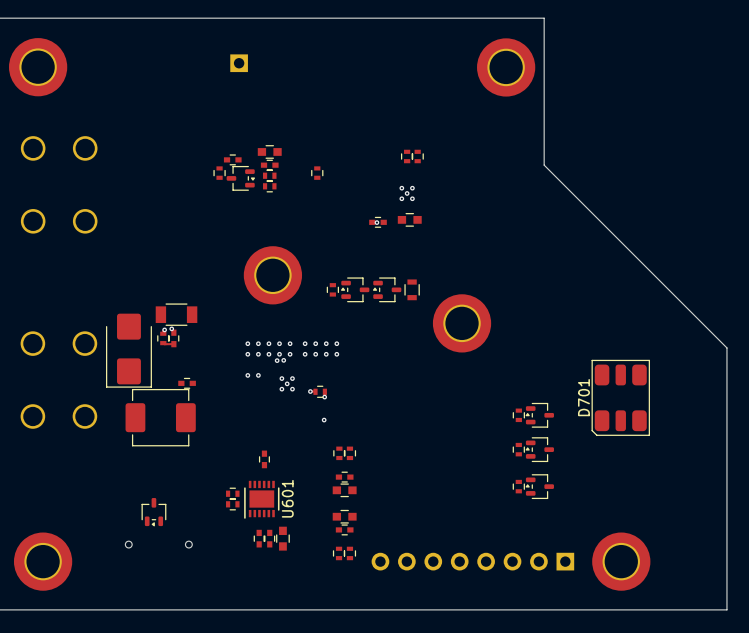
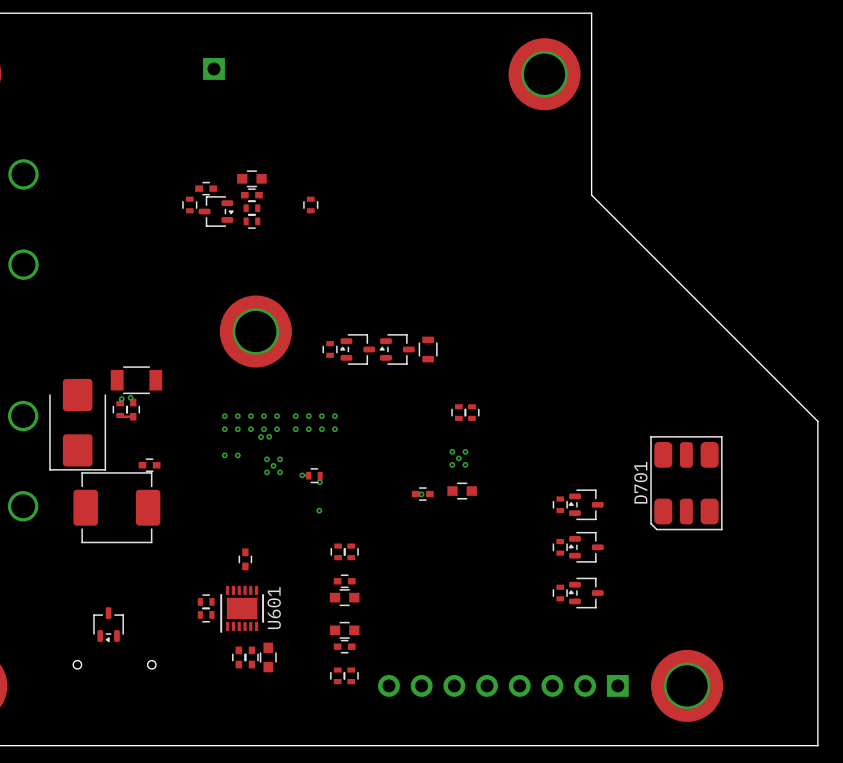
part: (407, 156) -> none
part: (417, 156) -> none
via: (401, 188) -> none
via: (412, 188) -> none
via: (407, 193) -> none
via: (401, 198) -> none
via: (412, 198) -> none
part position: (409, 219) -> (462, 491)
via: (376, 222) -> none
part position: (378, 222) -> (422, 494)
part: (462, 323) -> none
part: none -> (458, 412)
part: none -> (471, 412)
via: none -> (452, 451)
via: none -> (465, 451)
via: none -> (458, 458)
via: none -> (452, 464)
via: none -> (465, 464)
via: none -> (421, 494)

